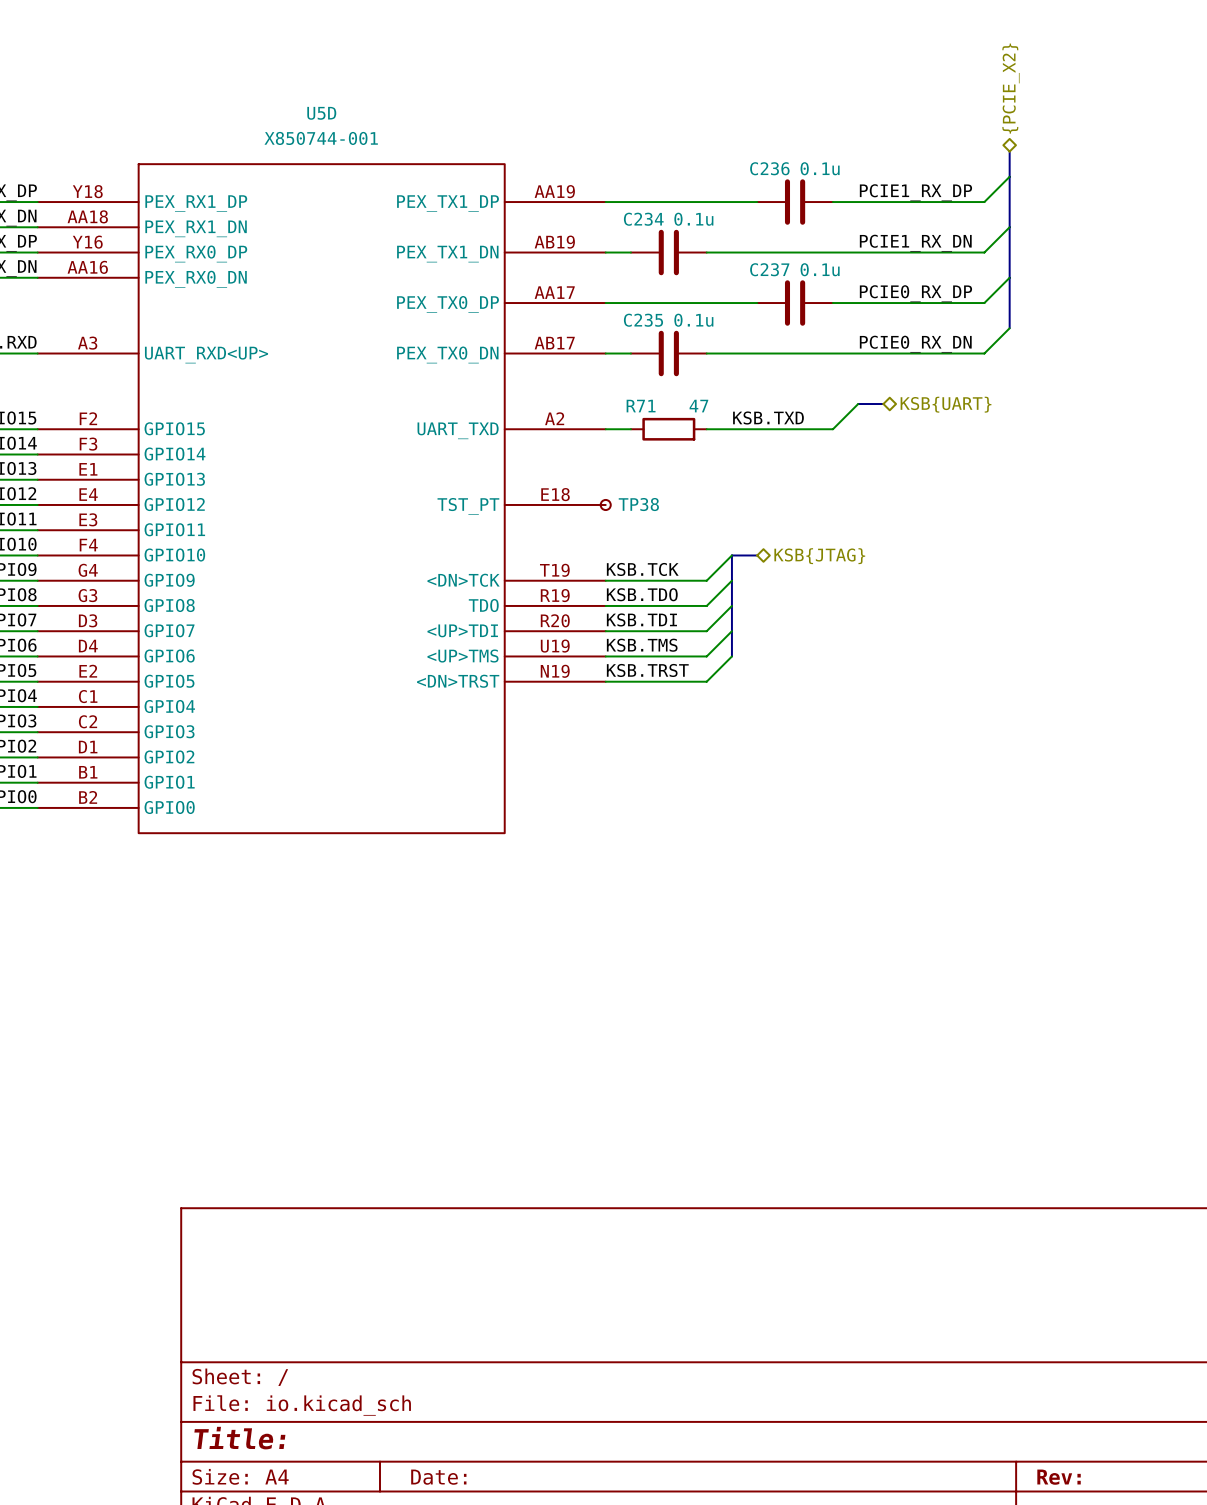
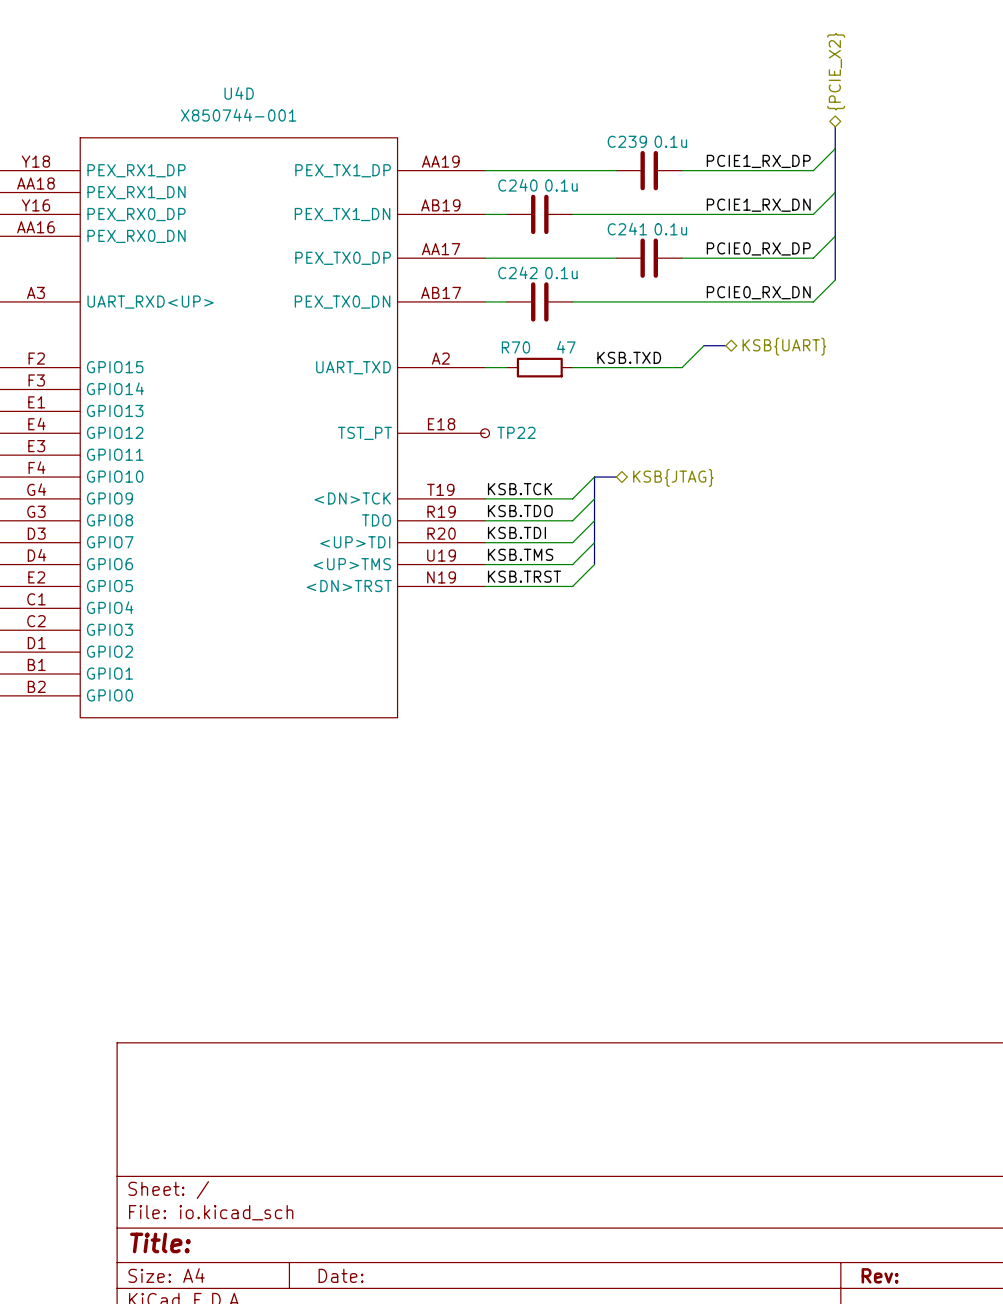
U5D name: U5D (321, 113) -> U4D (239, 93)
C236 name: C236 (769, 168) -> C239 (627, 141)
C234 name: C234 (643, 219) -> C240 (517, 185)
C237 name: C237 (769, 269) -> C241 (627, 229)
C235 name: C235 (643, 320) -> C242 (517, 272)
R71 name: R71 (641, 406) -> R70 (515, 347)
TP38 name: TP38 (638, 504) -> TP22 (516, 432)

